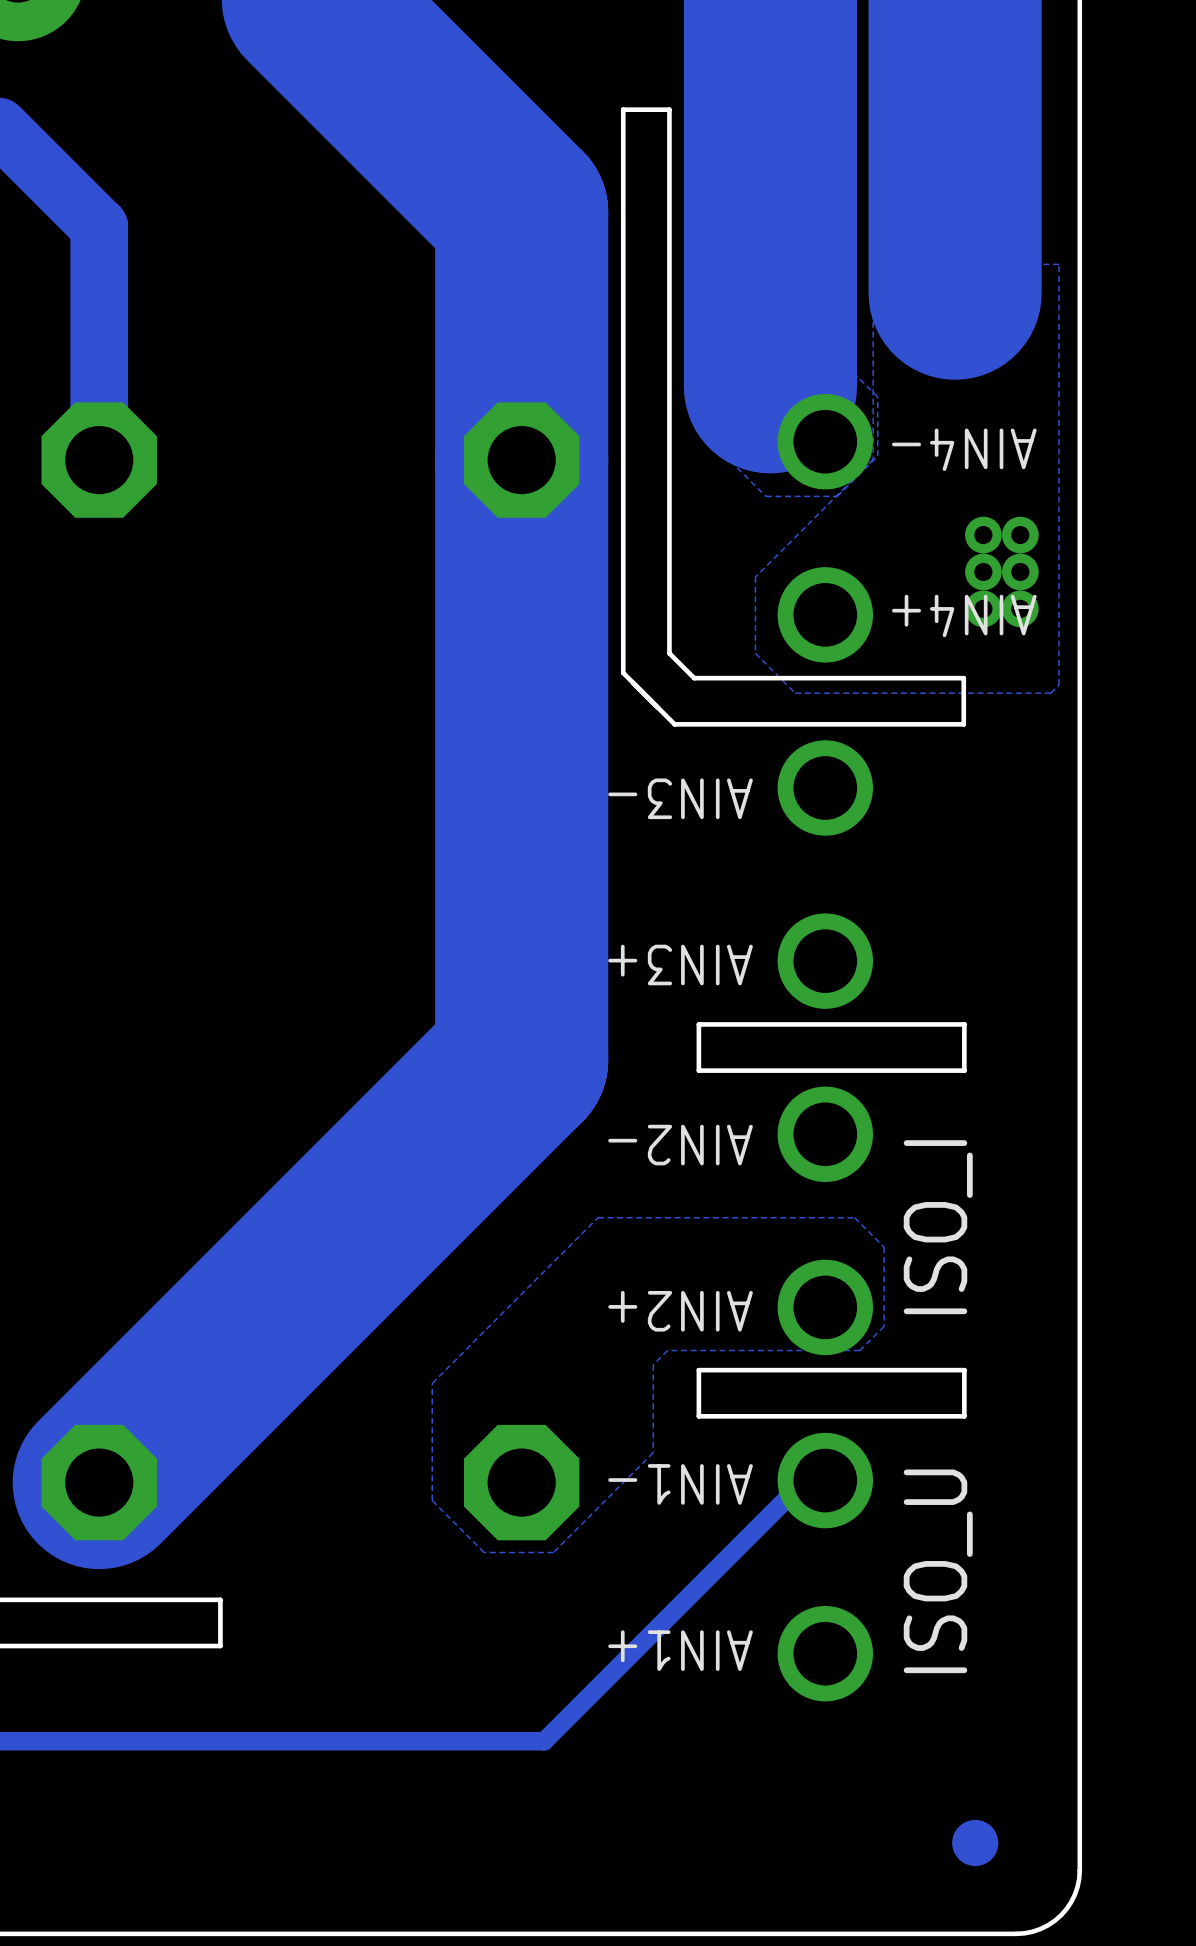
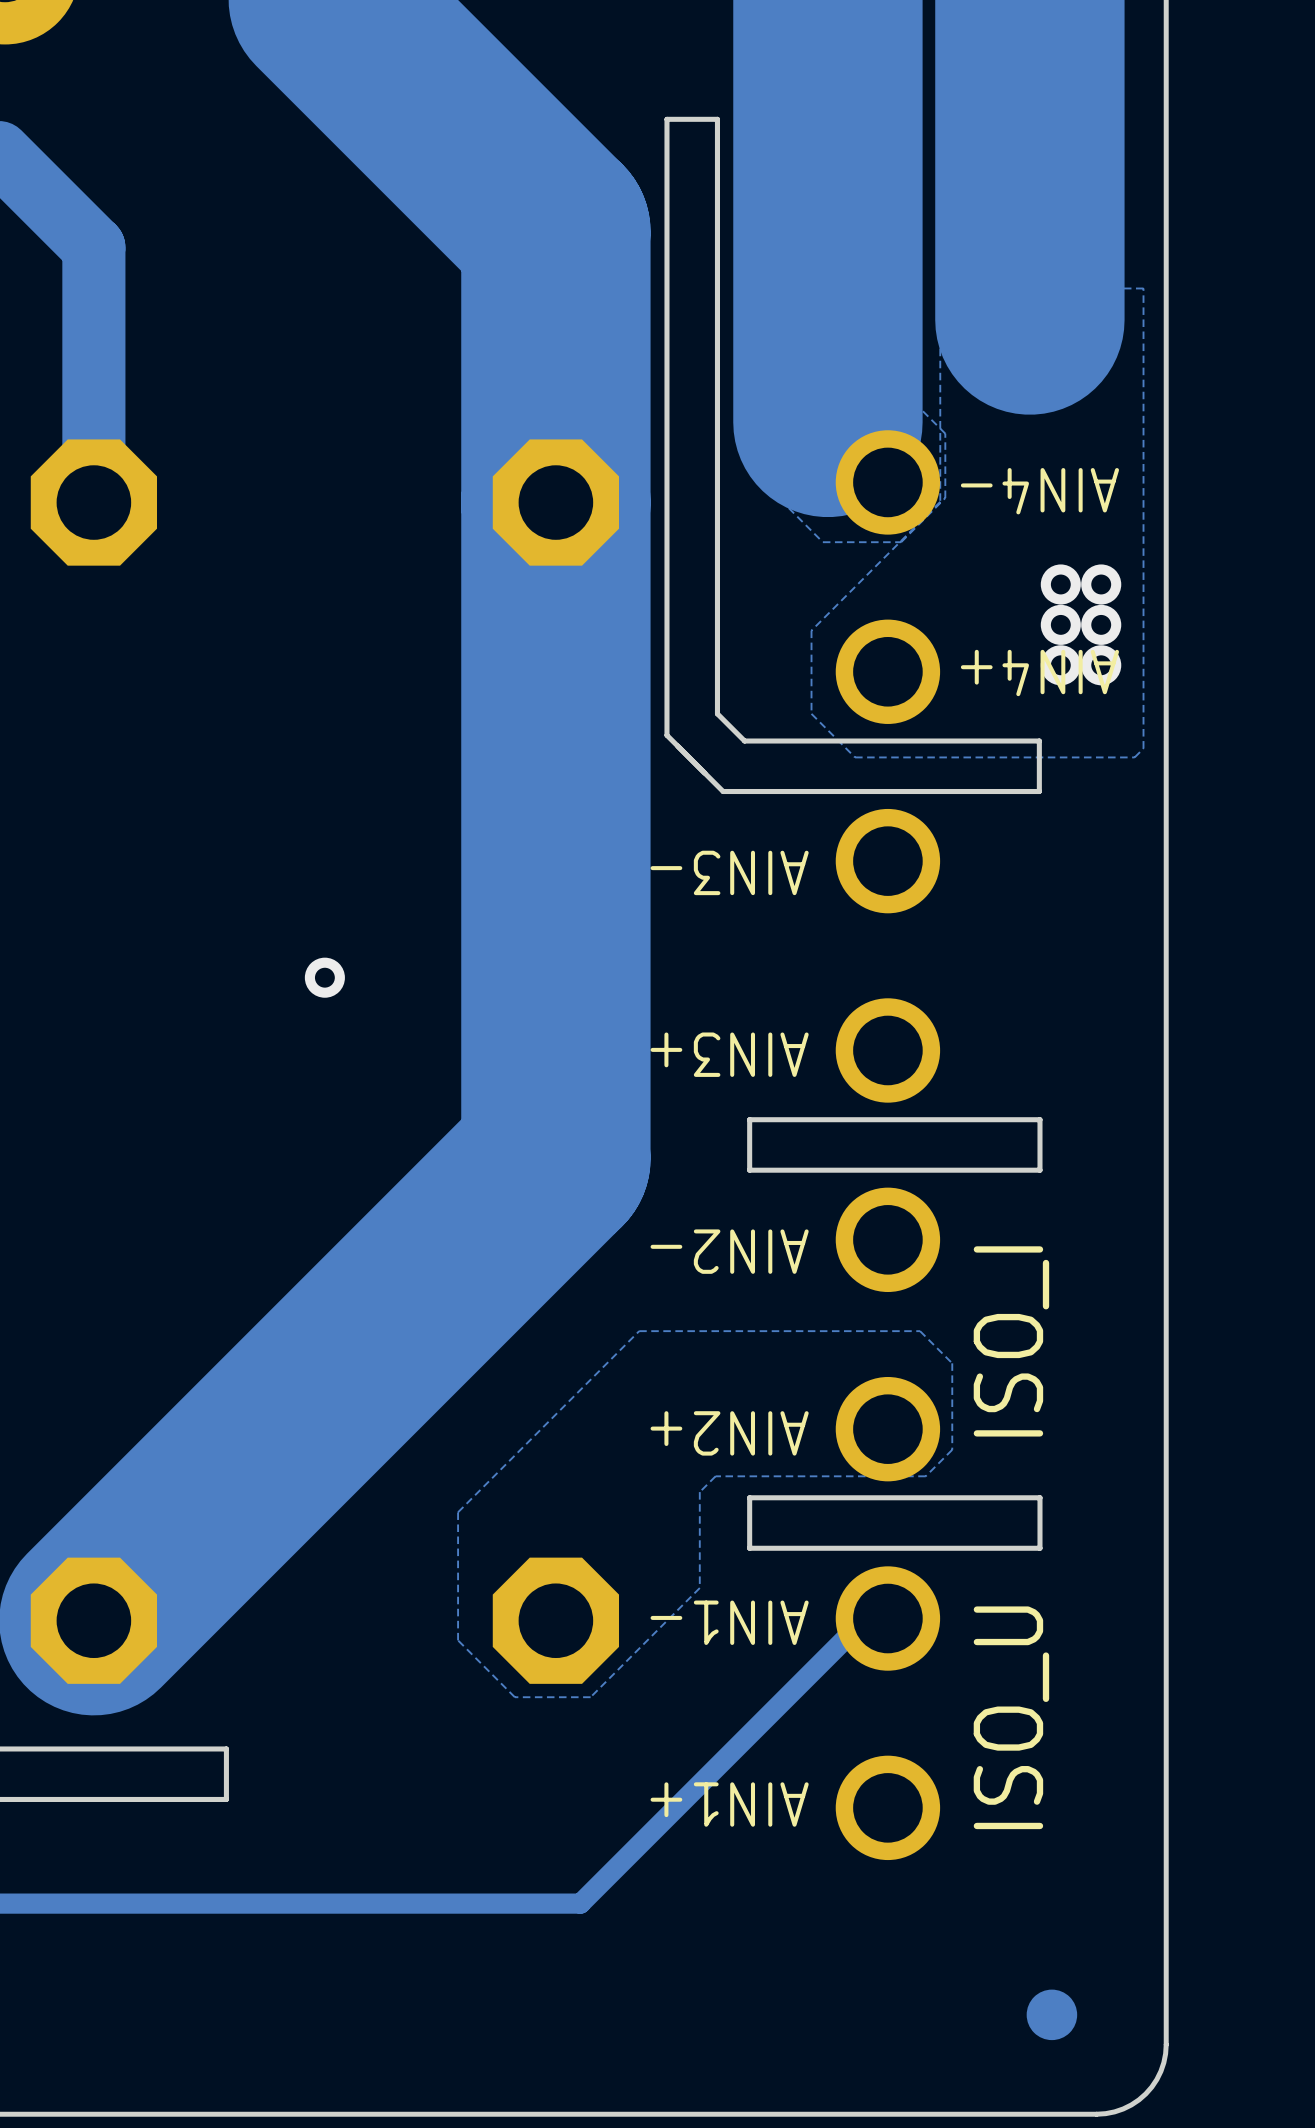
via: none -> (324, 977)

